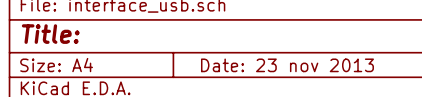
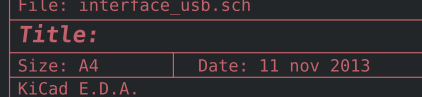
title block: Date: 23 nov 2013 (287, 65) -> Date: 11 nov 2013 (284, 65)

